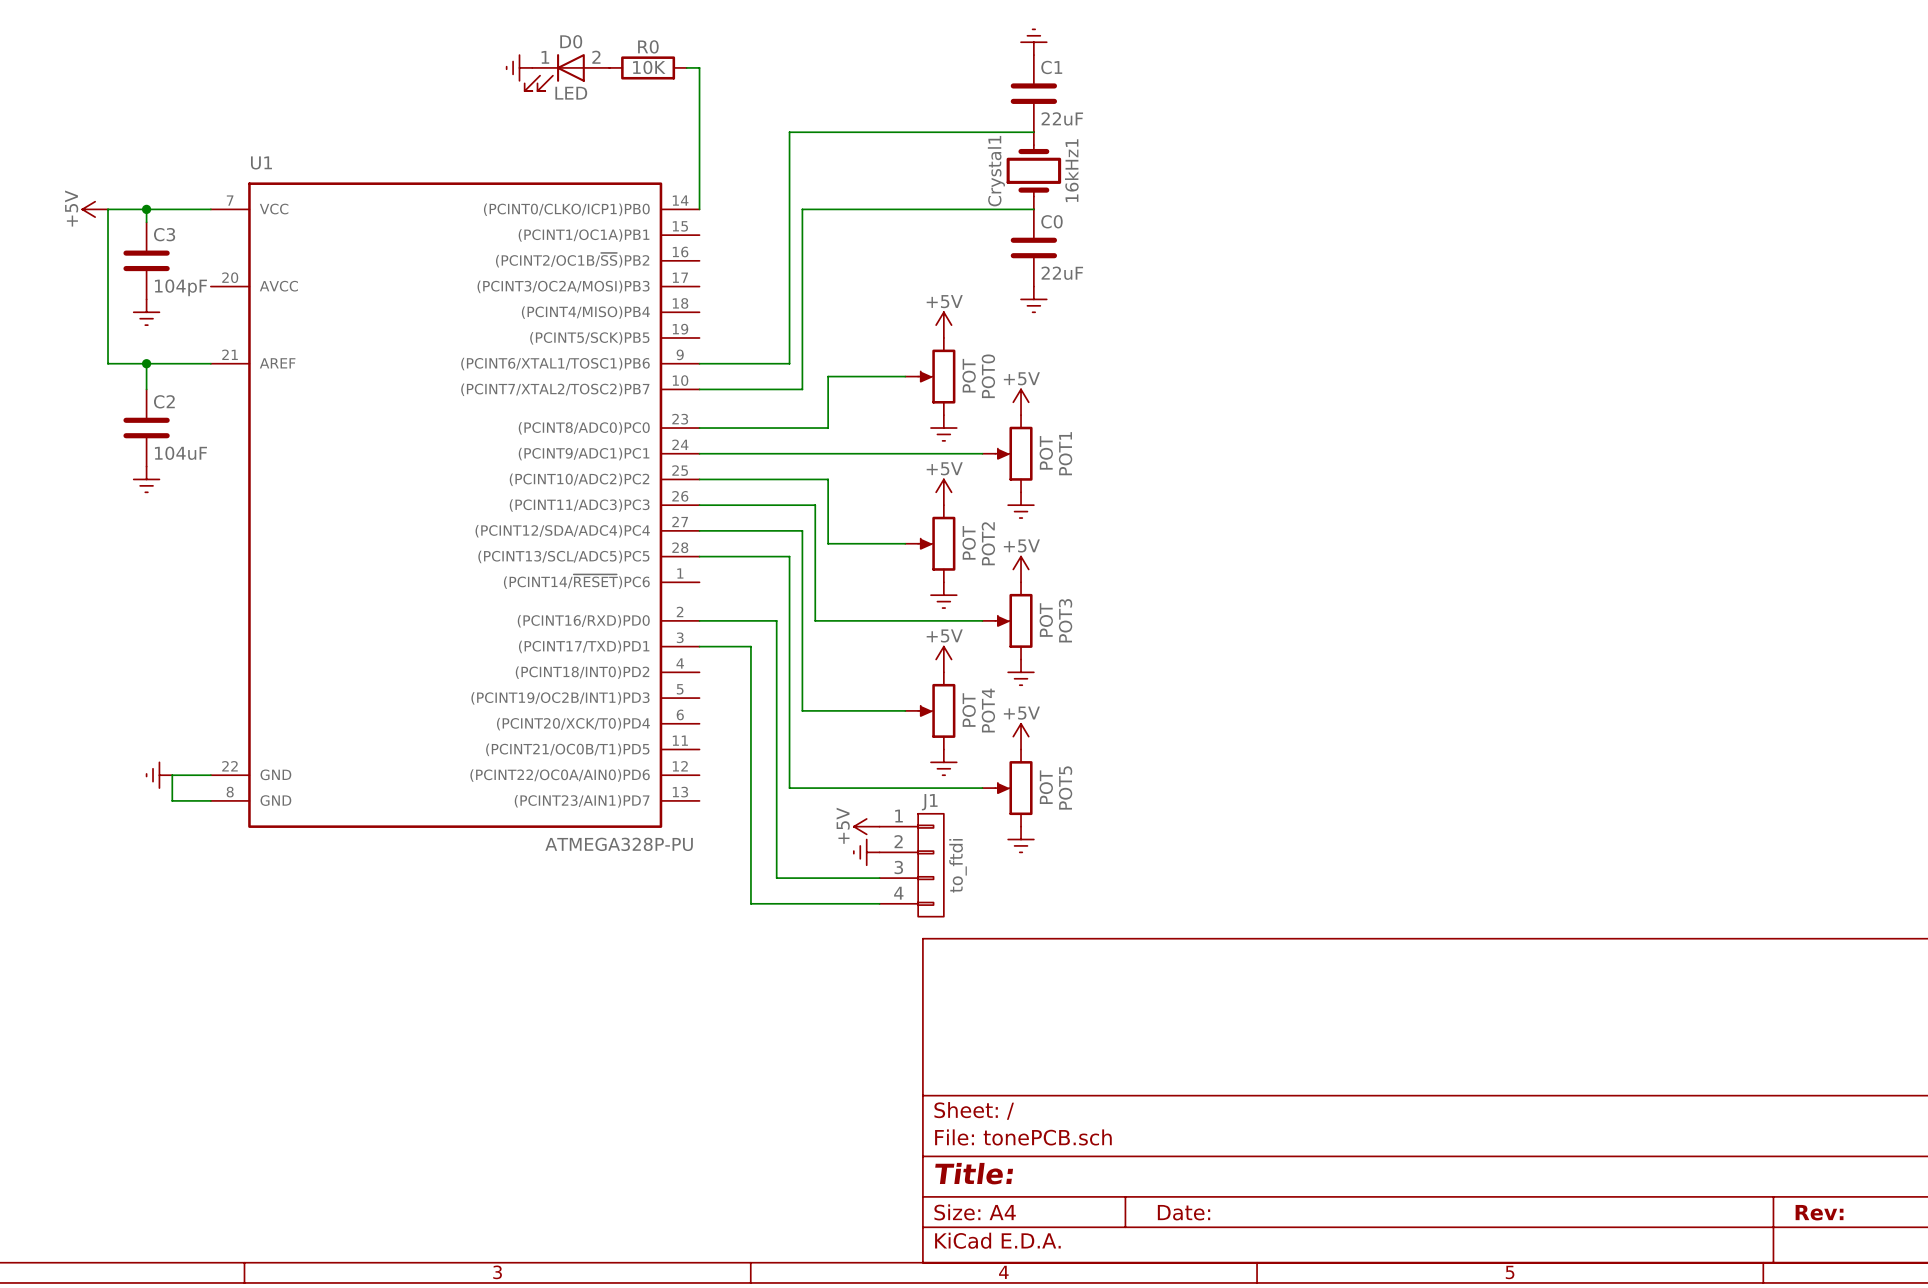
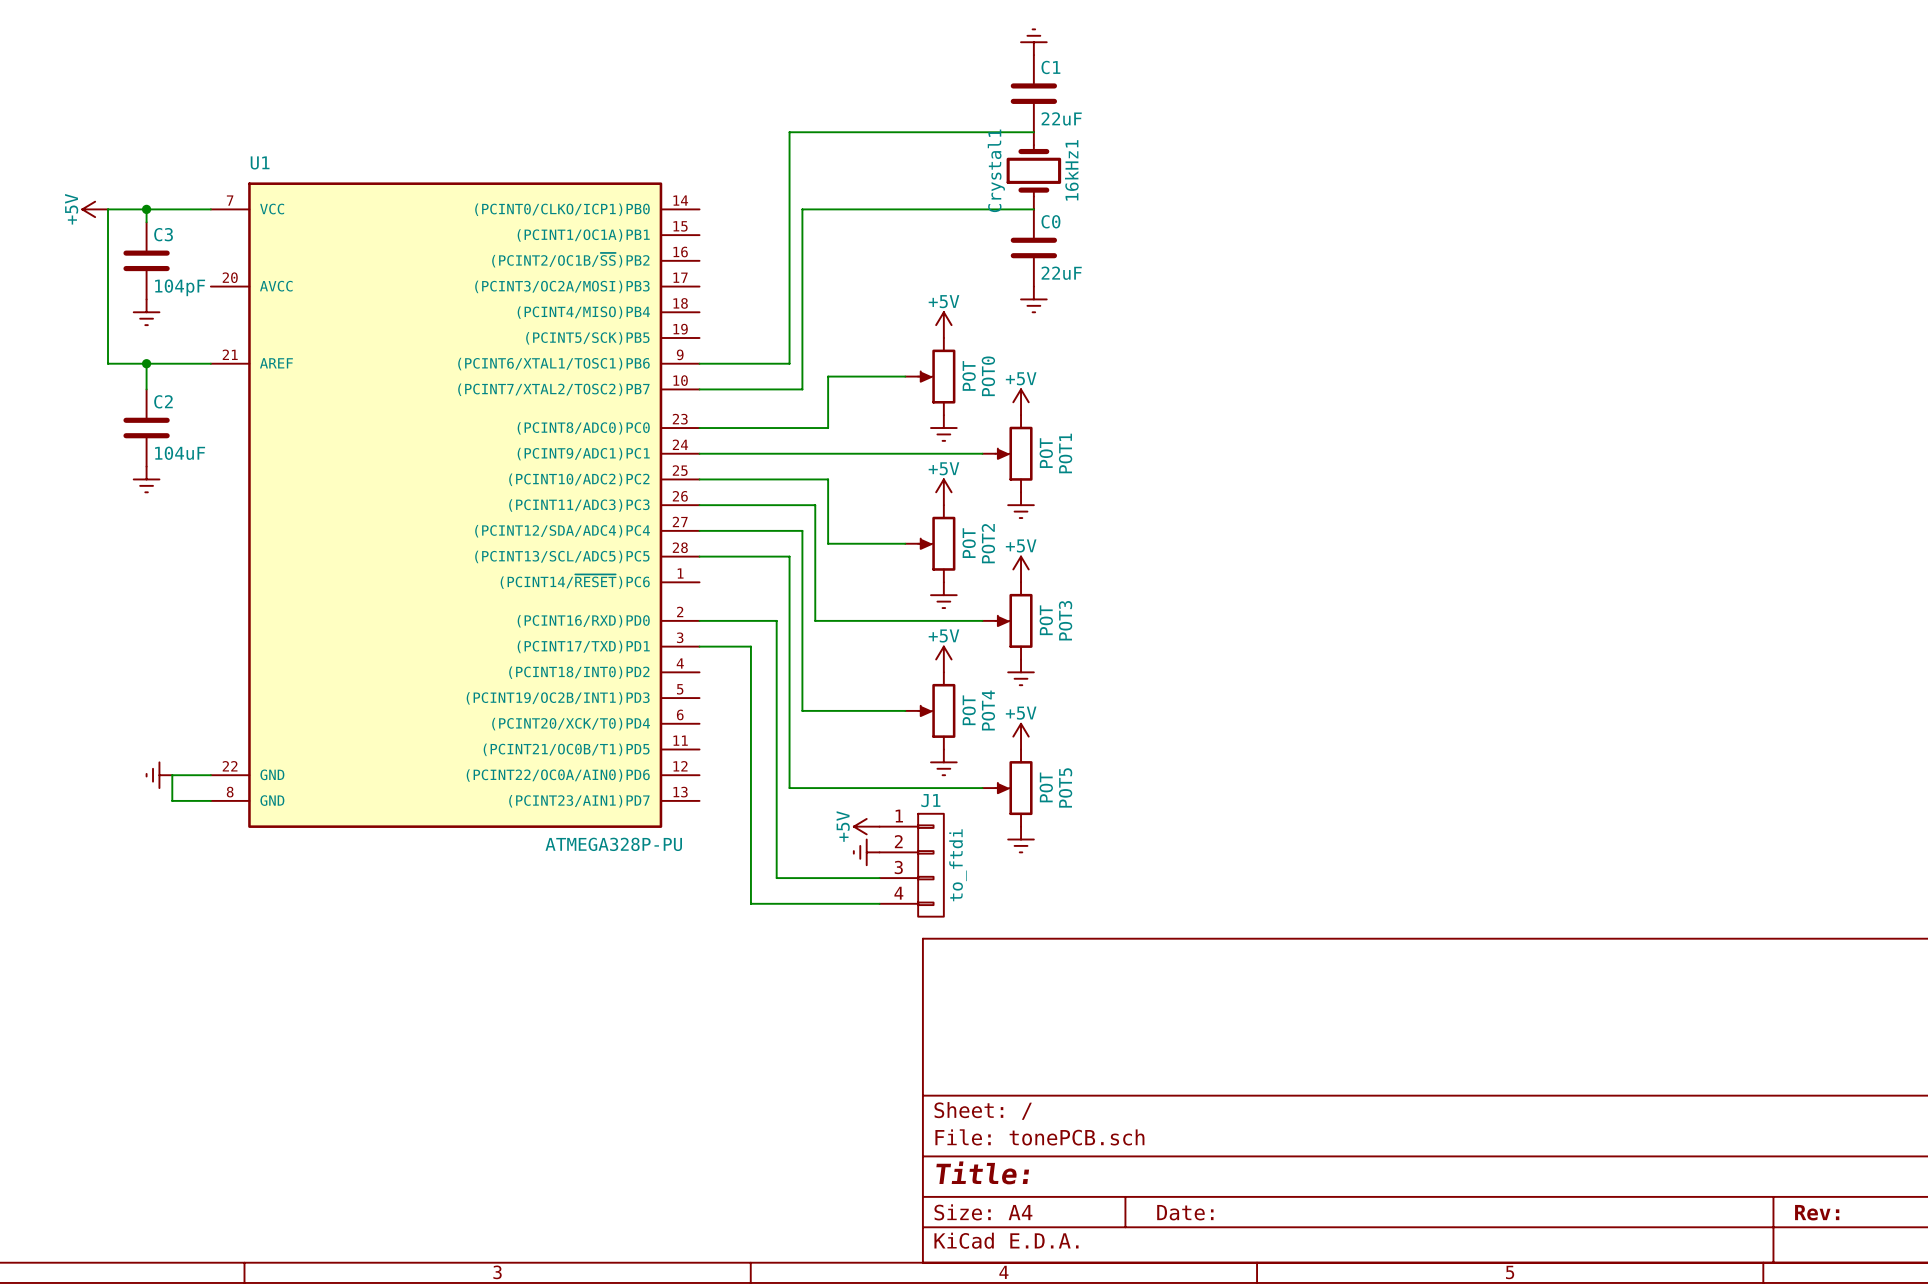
power symbol: (519, 67) -> none
R0: 10K (648, 67) -> none
wire: (686, 67) (699, 67) (699, 209) -> none
D0: LED (567, 72) -> none

